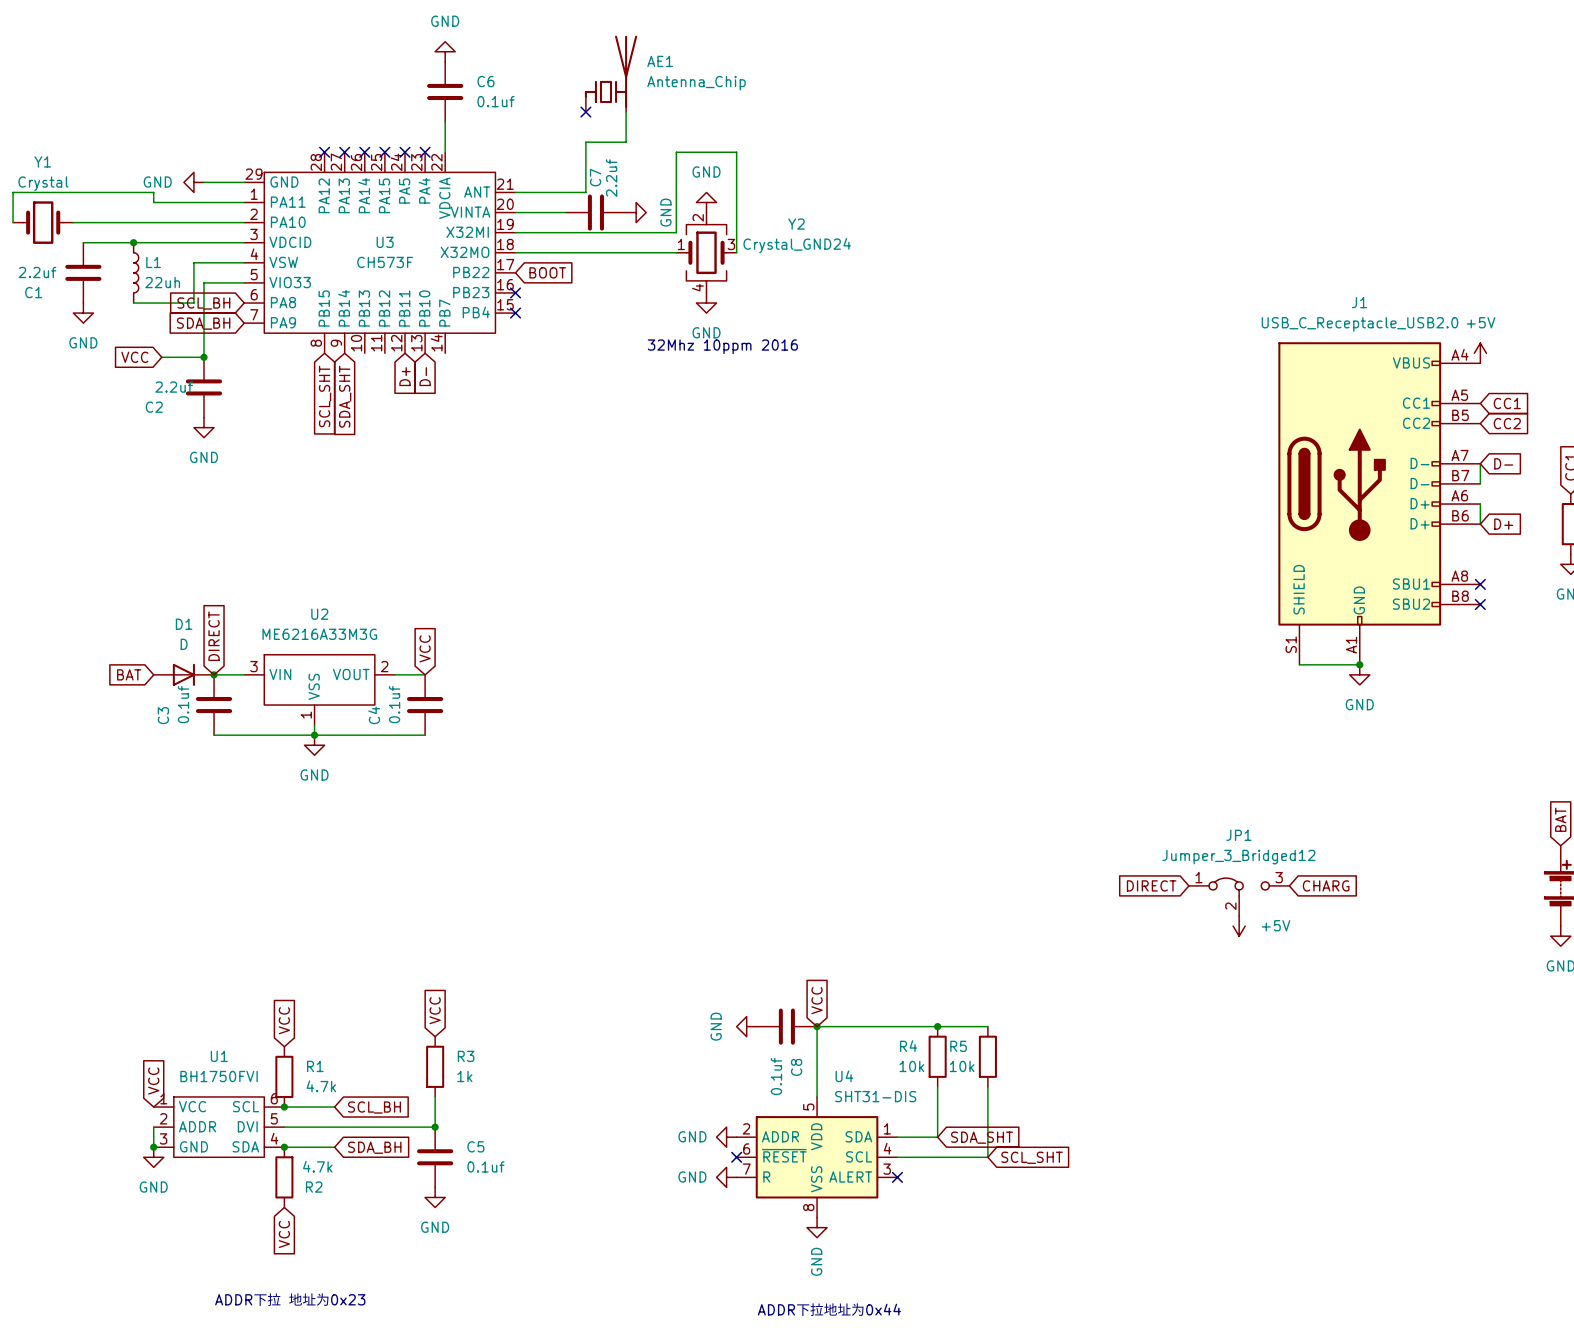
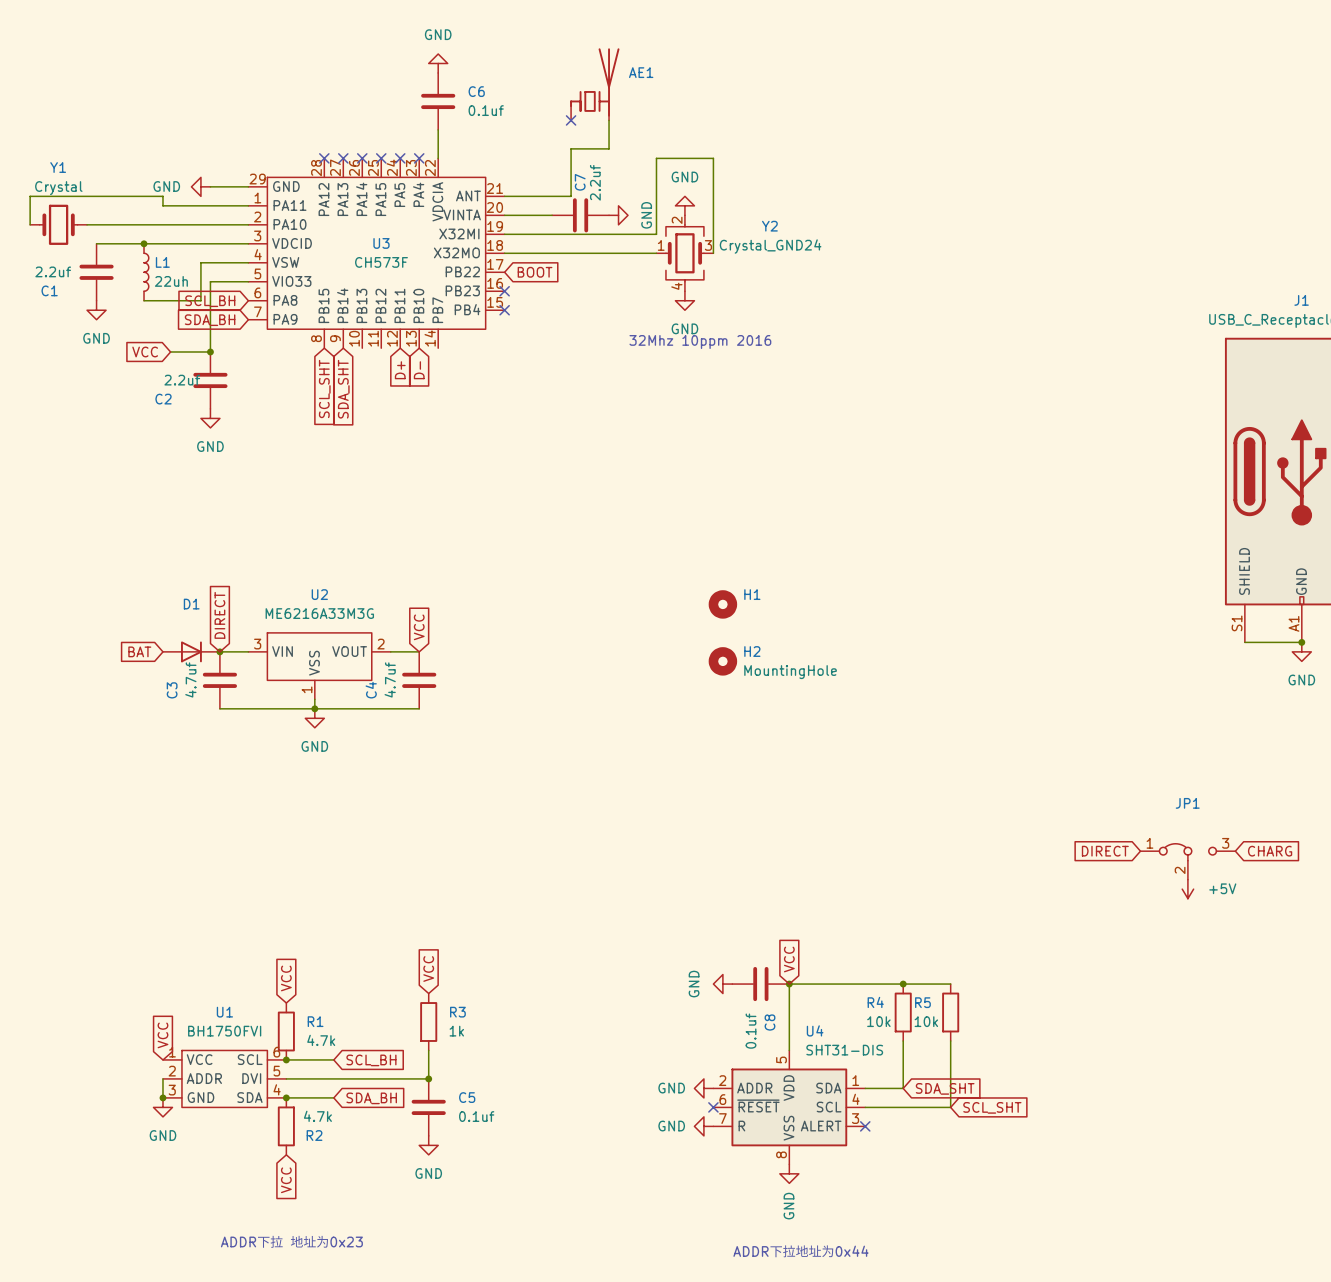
AE1 value: Antenna_Chip (696, 83) -> none
H1: none -> (722, 604)
D1 value: D (184, 644) -> none
H2: none -> MountingHole (722, 661)
C3 value: 0.1uf (183, 704) -> 4.7uf (190, 679)
C4 value: 0.1uf (394, 704) -> 4.7uf (390, 679)
JP1 value: Jumper_3_Bridged12 (1238, 857) -> none

